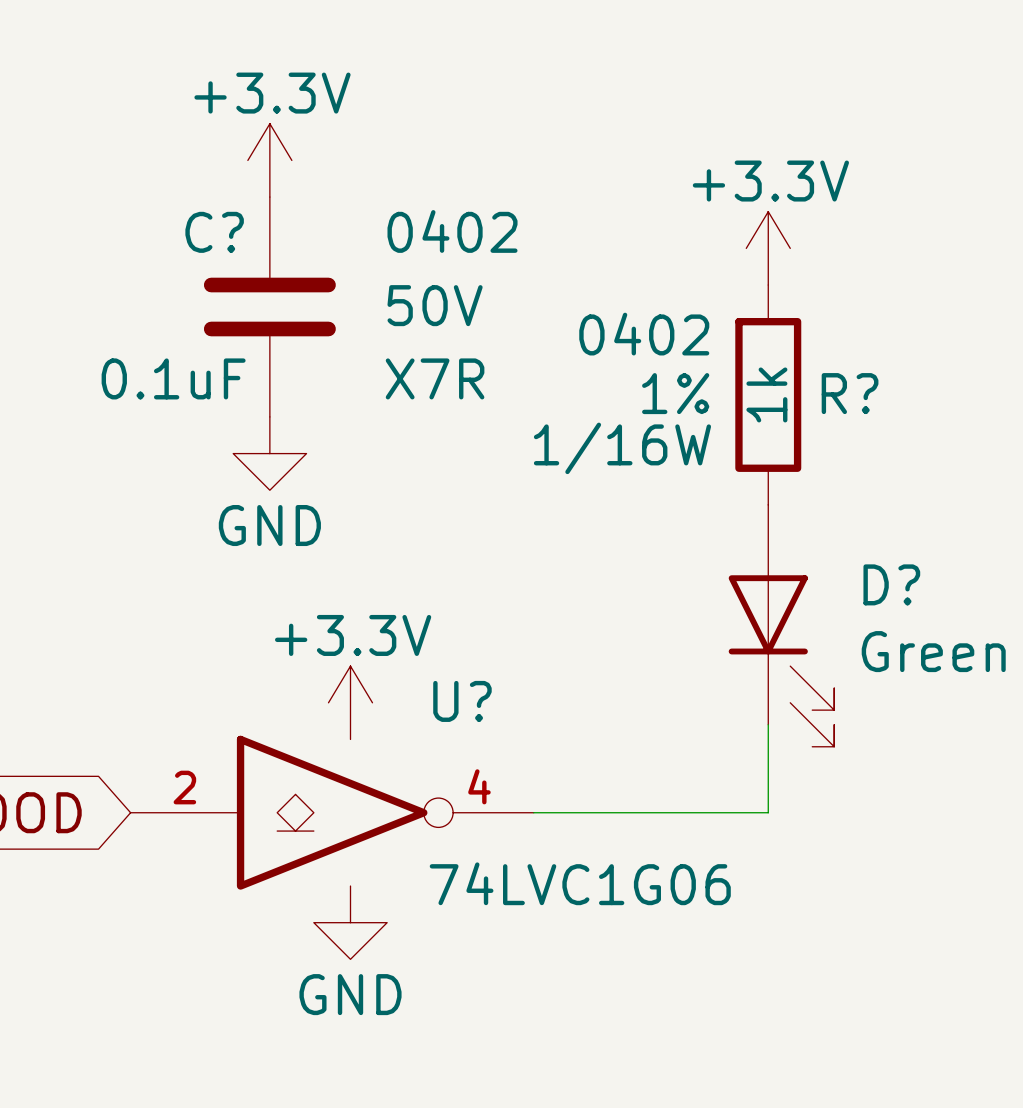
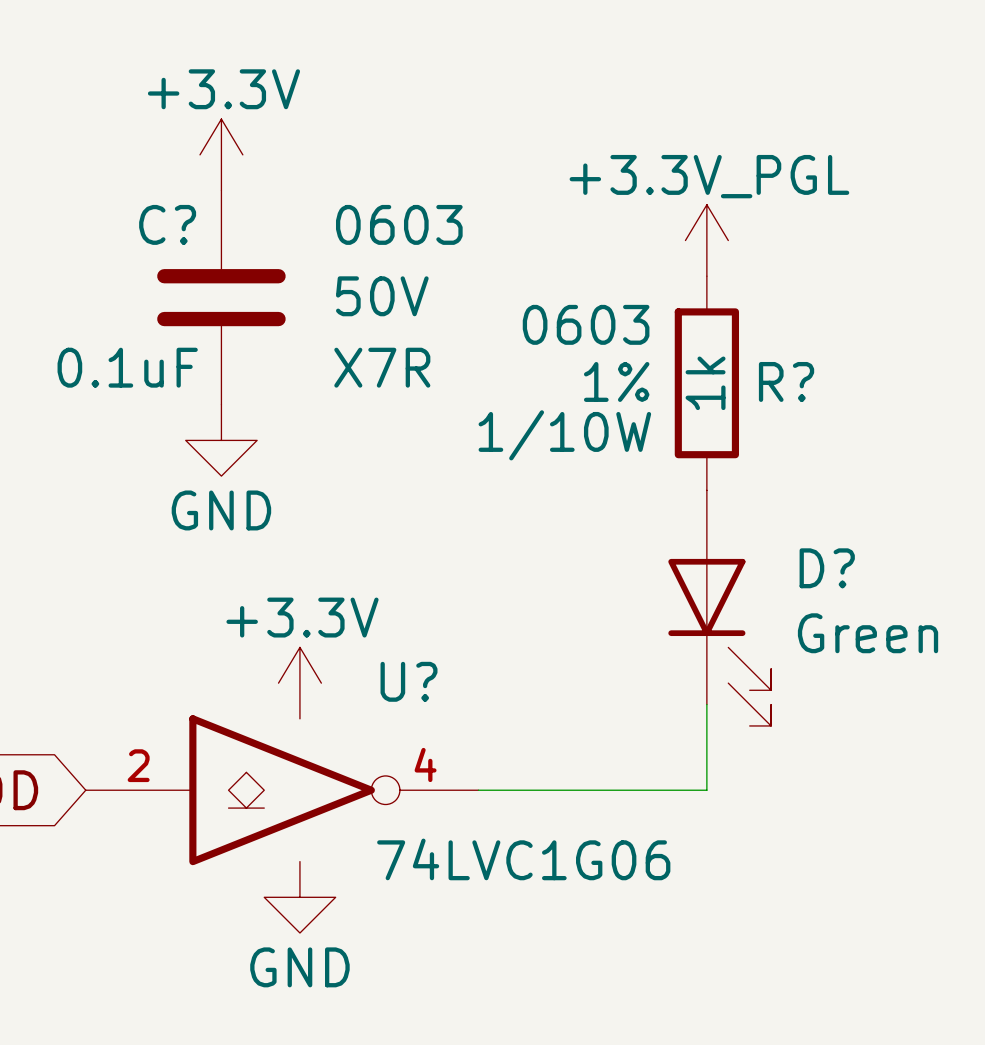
C? text: 0402 (452, 231) -> 0603 (399, 224)
power symbol: +3.3V (768, 248) -> +3.3V_PGL (706, 240)
R? text: 0402 (644, 334) -> 0603 (586, 324)
R? text: 1/16W (622, 448) -> 1/10W (564, 435)

